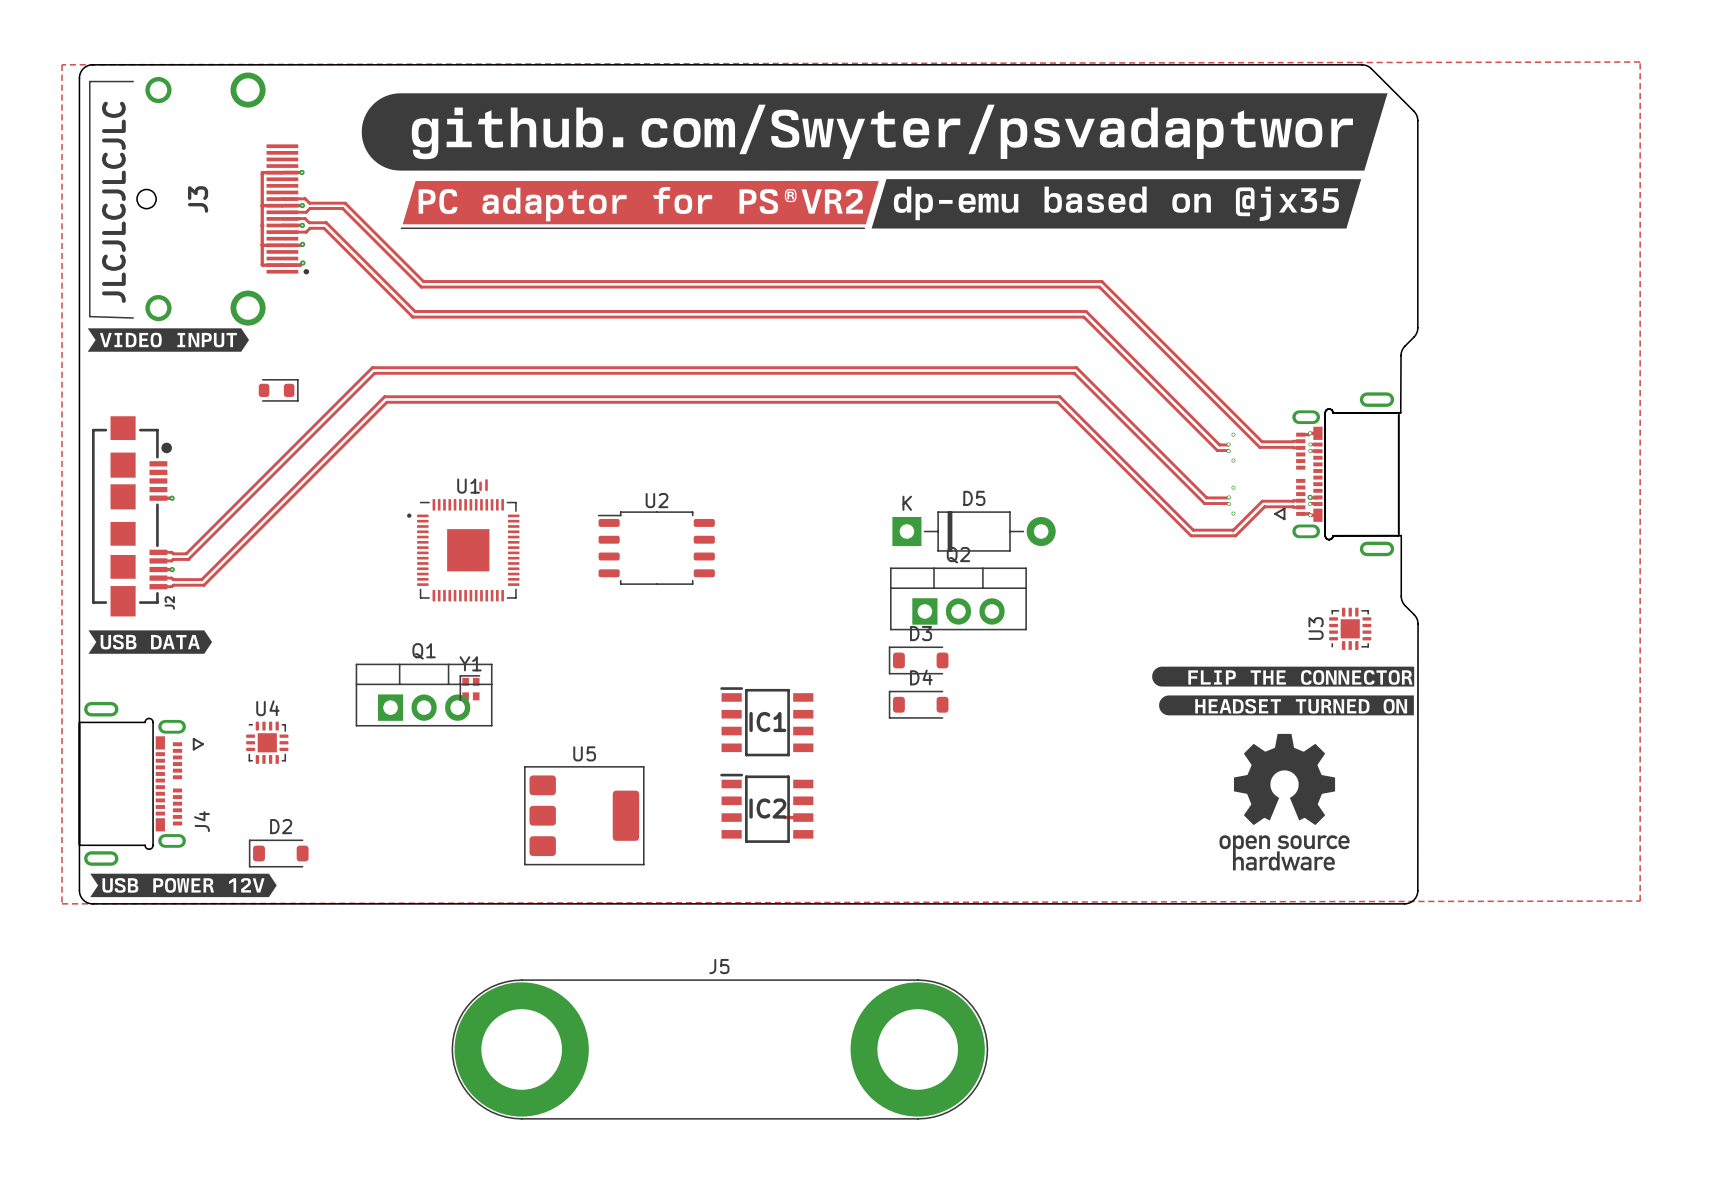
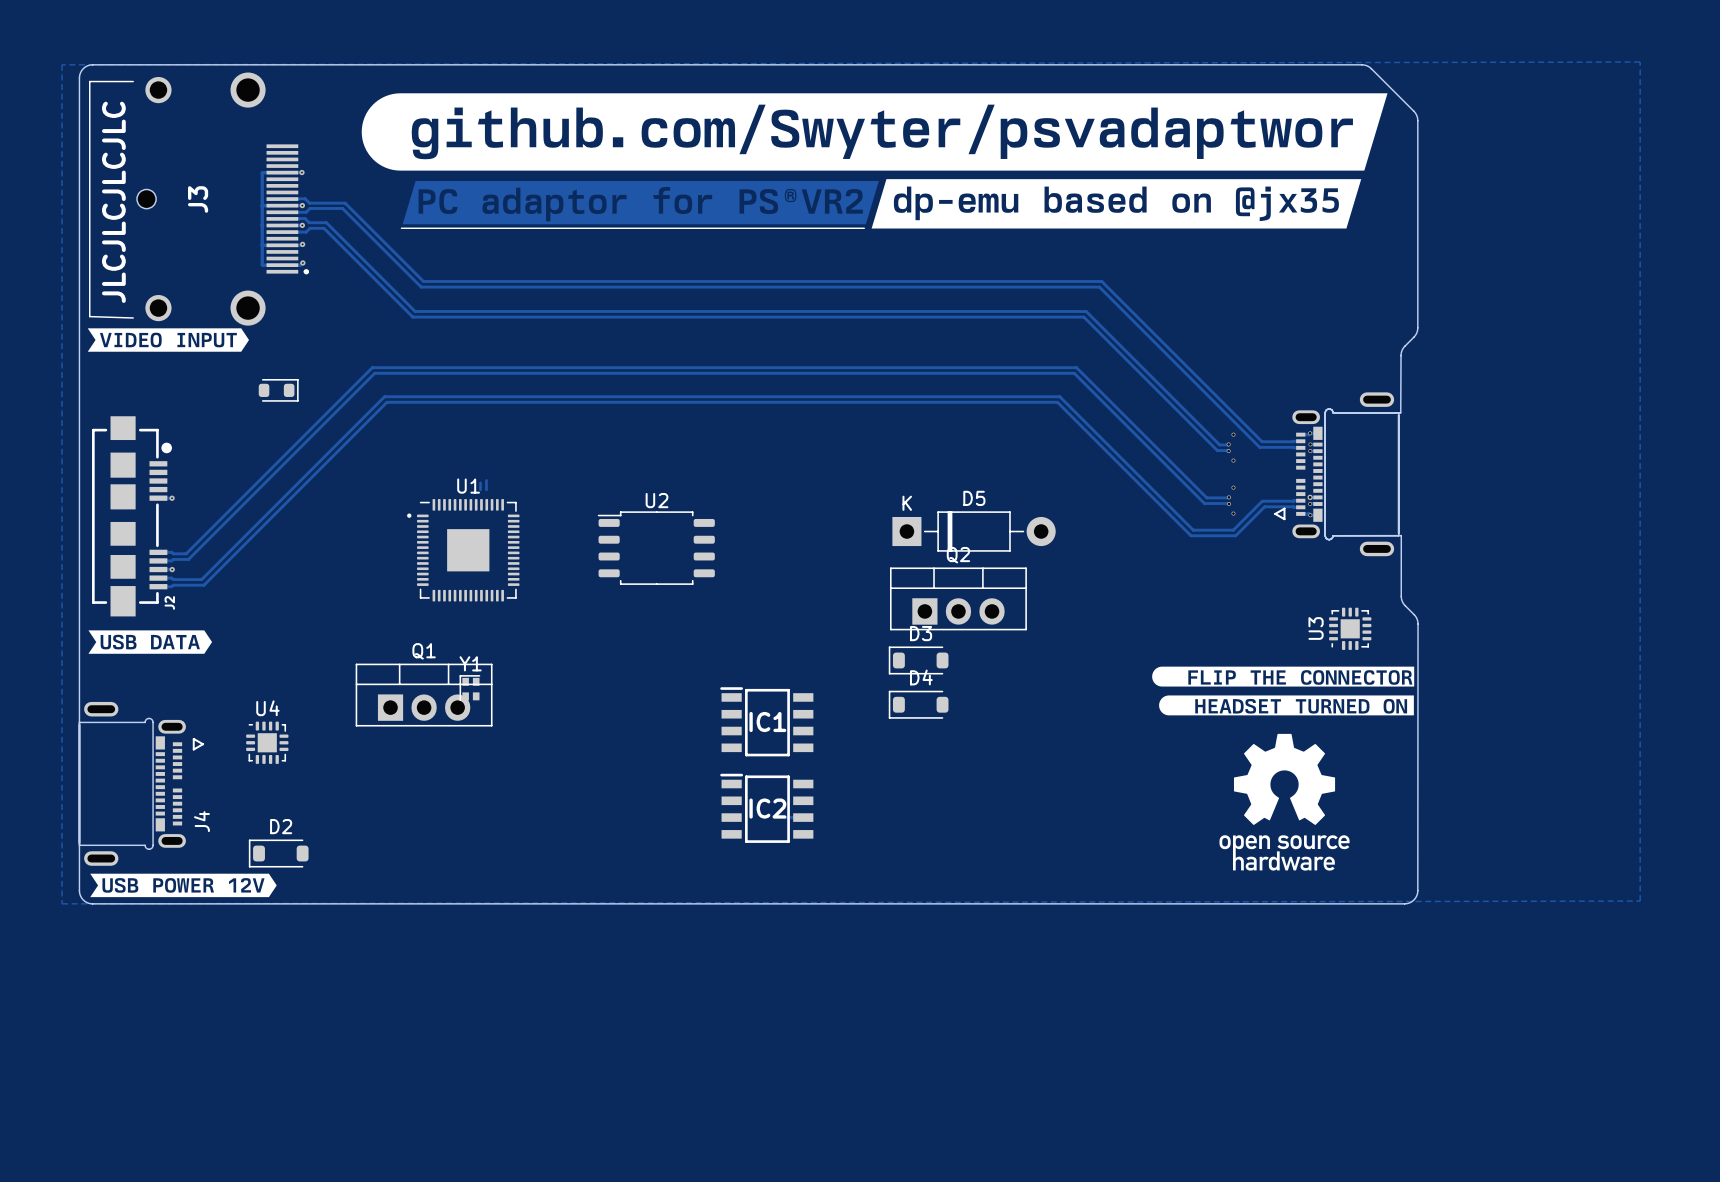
U5: (584, 815) -> none
J5: (719, 1049) -> none

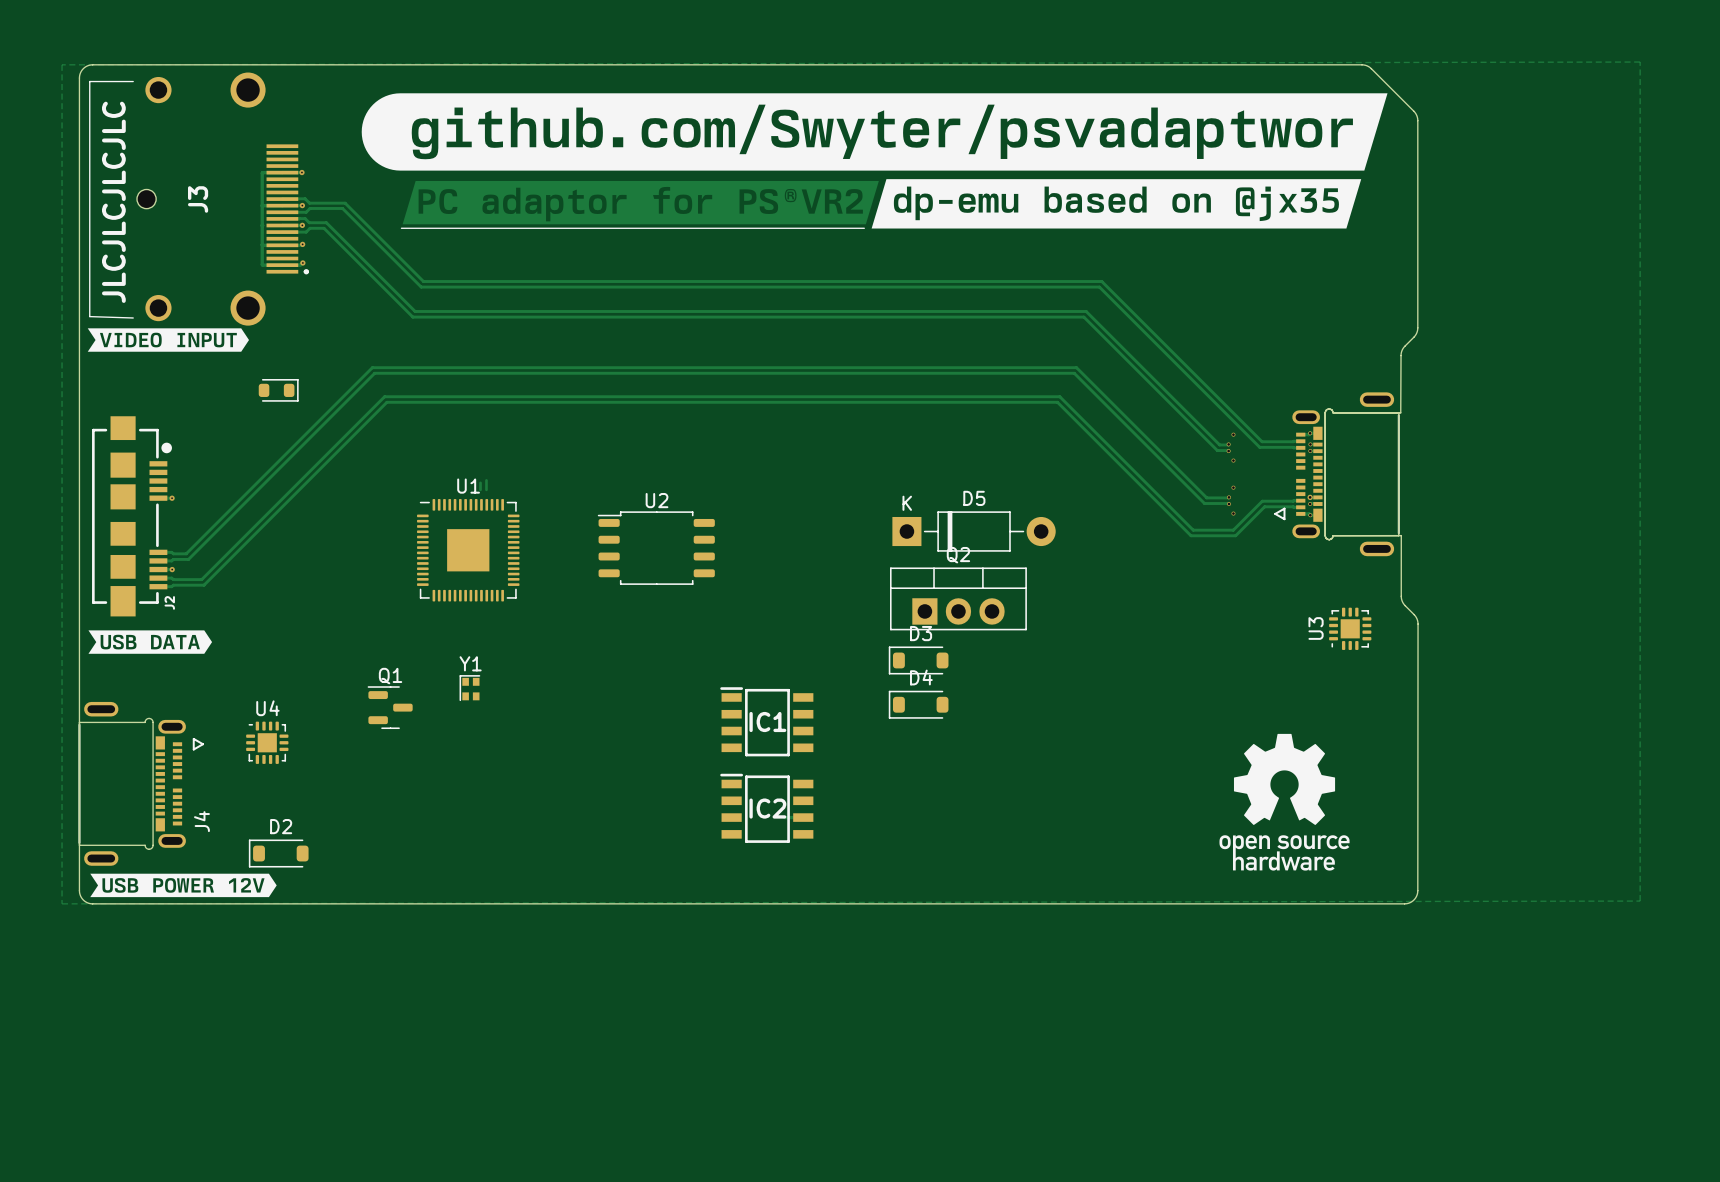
drawing: [407, 513, 412, 518] -> none
Q1 footprint: [355, 663, 493, 727] -> [367, 686, 413, 730]
drawing: [1152, 666, 1415, 716] -> none

